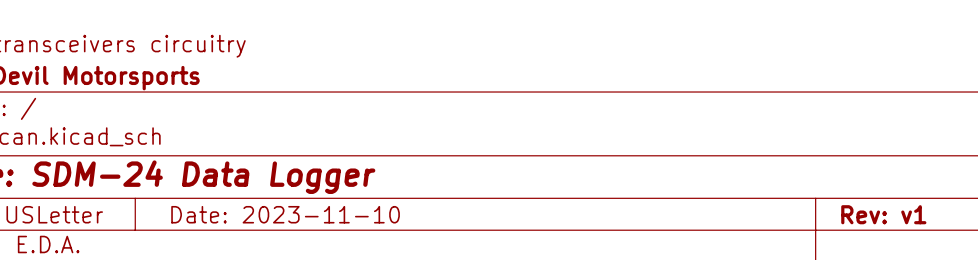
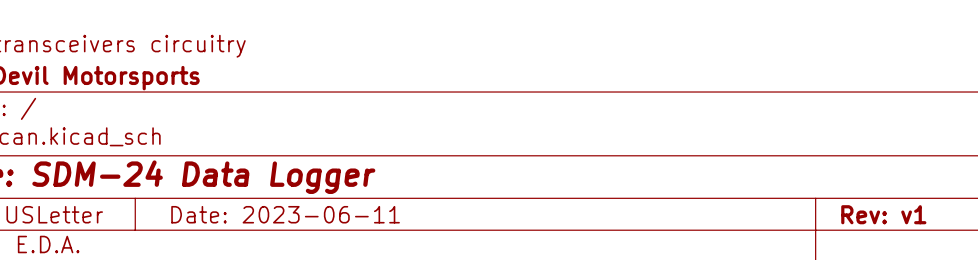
title block: Date: 2023-11-10 (285, 214) -> Date: 2023-06-11 (285, 214)

